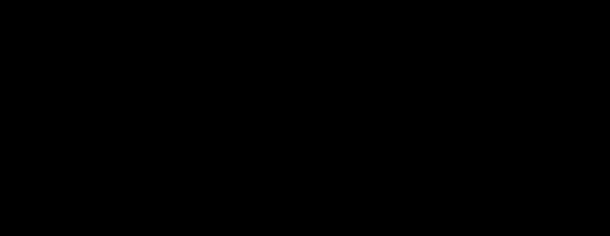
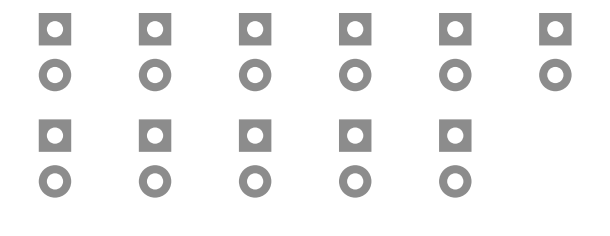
part: none -> (54, 52)
part: none -> (155, 52)
part: none -> (255, 52)
part: none -> (355, 52)
part: none -> (455, 52)
part: none -> (555, 52)
part: none -> (54, 158)
part: none -> (155, 158)
part: none -> (255, 158)
part: none -> (355, 158)
part: none -> (455, 158)

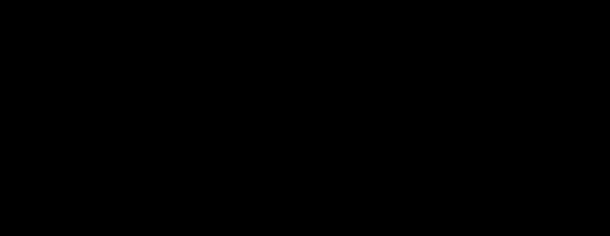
part: (54, 52) -> none
part: (155, 52) -> none
part: (255, 52) -> none
part: (355, 52) -> none
part: (455, 52) -> none
part: (555, 52) -> none
part: (54, 158) -> none
part: (155, 158) -> none
part: (255, 158) -> none
part: (355, 158) -> none
part: (455, 158) -> none

